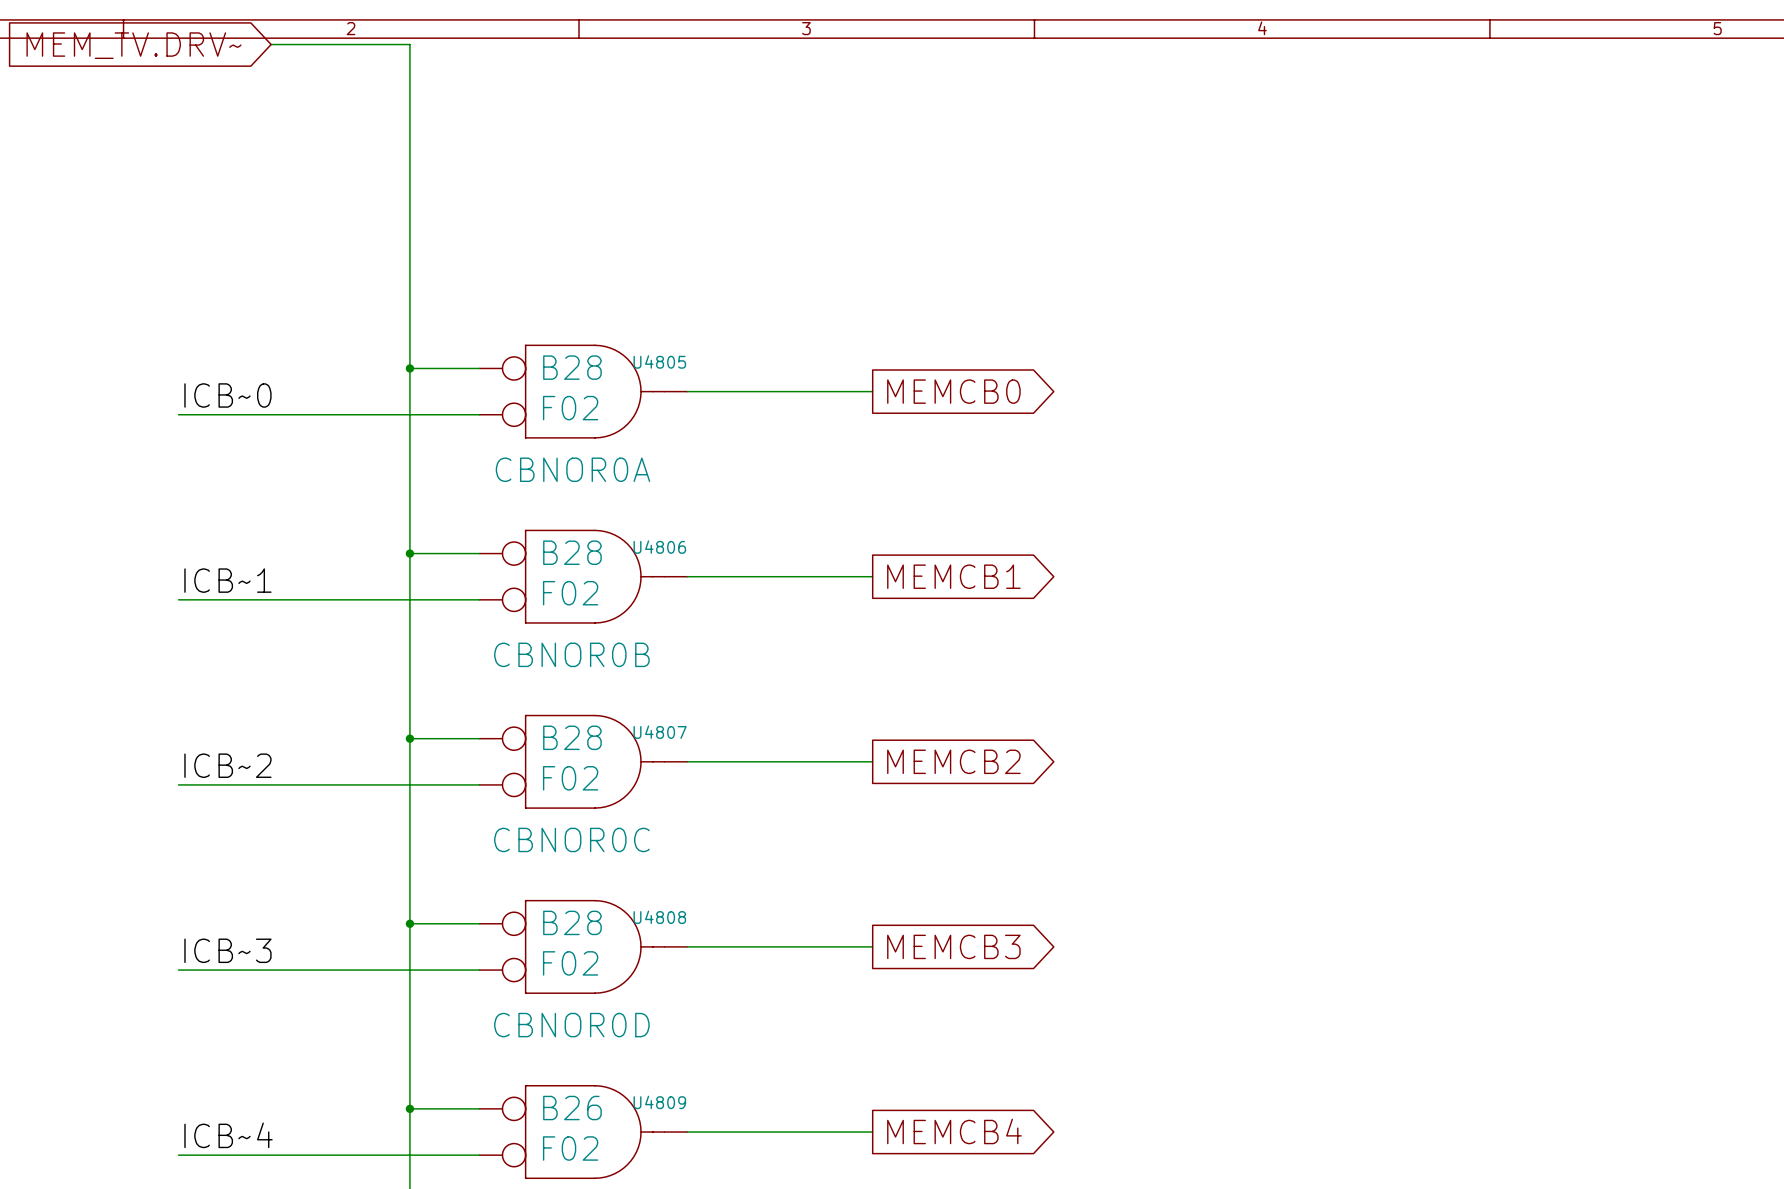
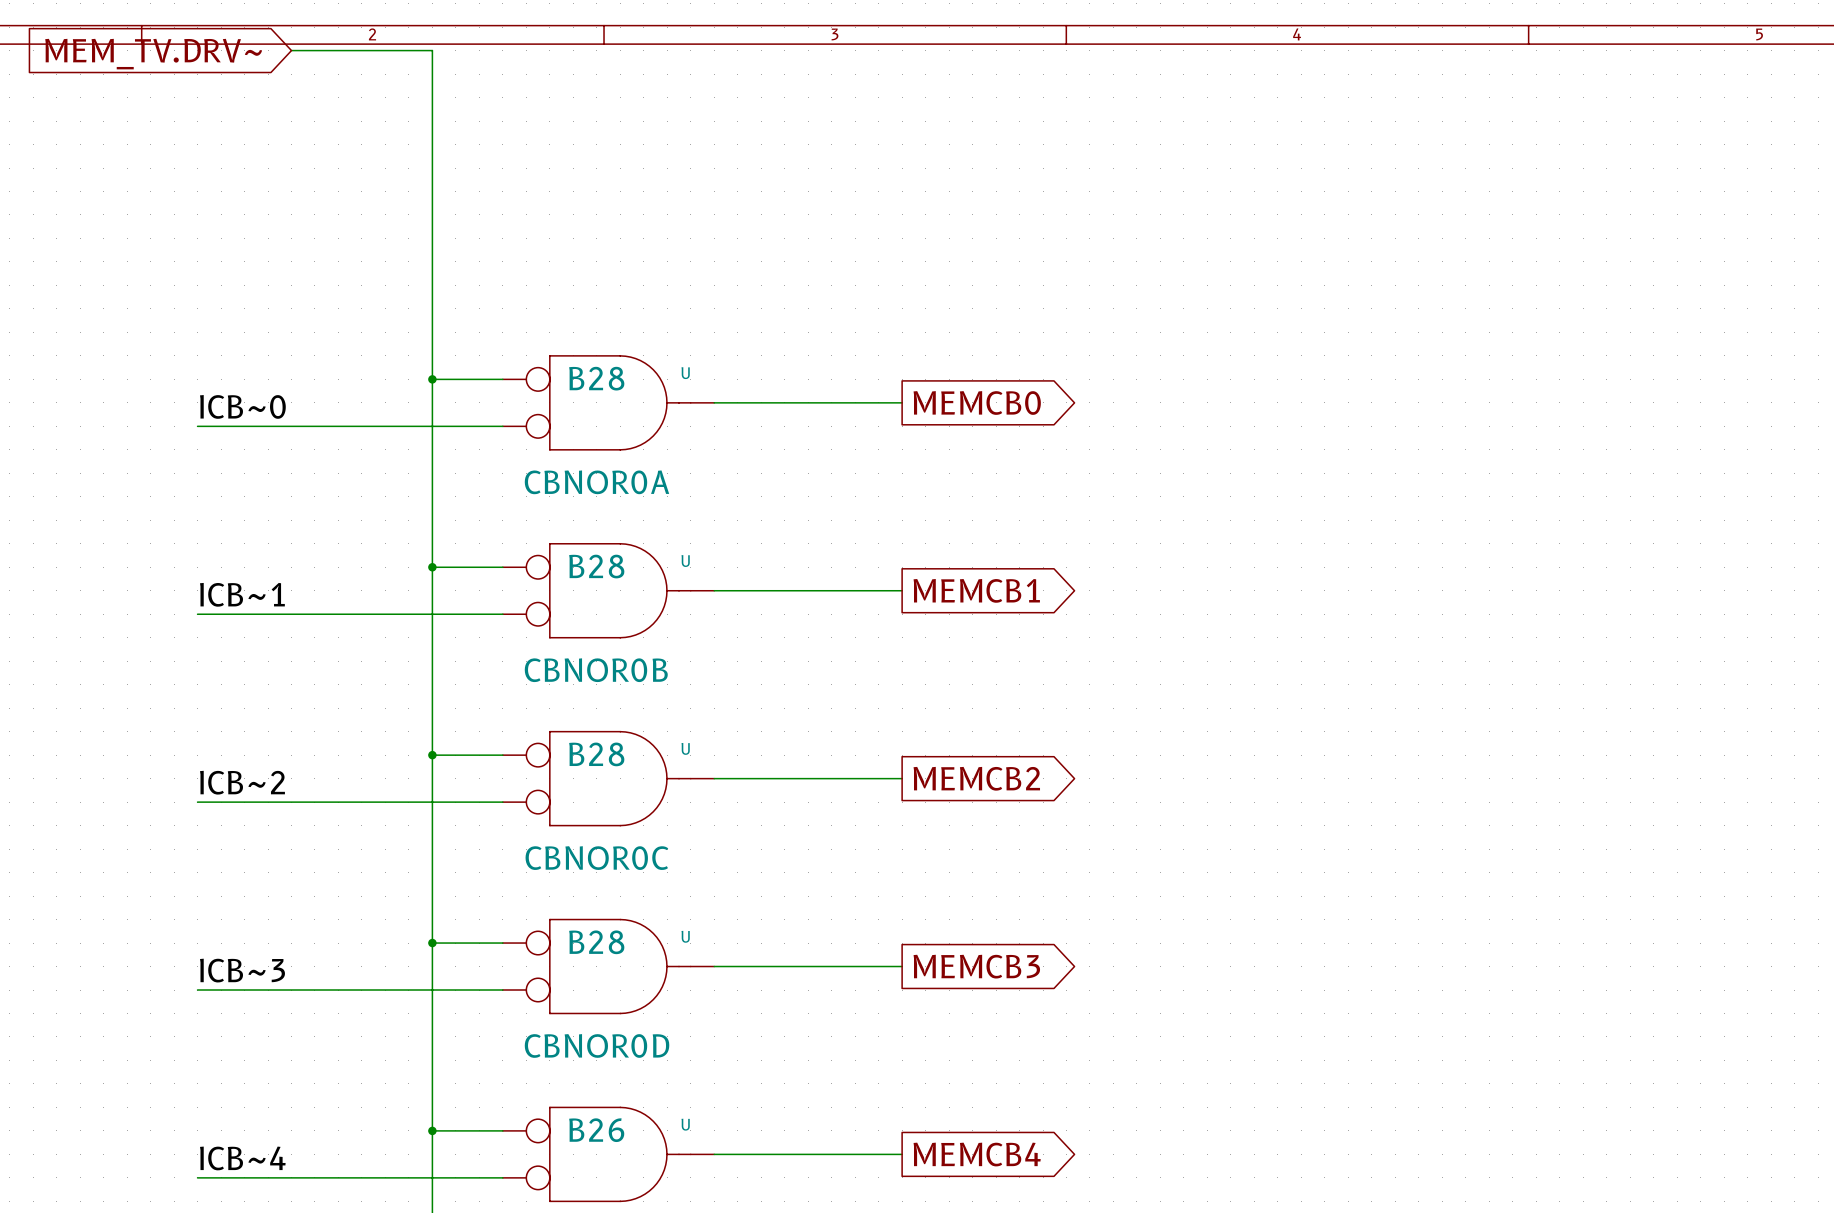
U4805 name: U4805 (659, 361) -> U (685, 373)
U4805 value: F02 (570, 408) -> none
U4806 name: U4806 (659, 547) -> U (685, 561)
U4806 value: F02 (570, 593) -> none
U4807 name: U4807 (660, 732) -> U (685, 748)
U4807 value: F02 (570, 778) -> none
U4808 name: U4808 (659, 917) -> U (685, 936)
U4808 value: F02 (570, 963) -> none
U4809 name: U4809 (659, 1102) -> U (685, 1124)
U4809 value: F02 (570, 1148) -> none

